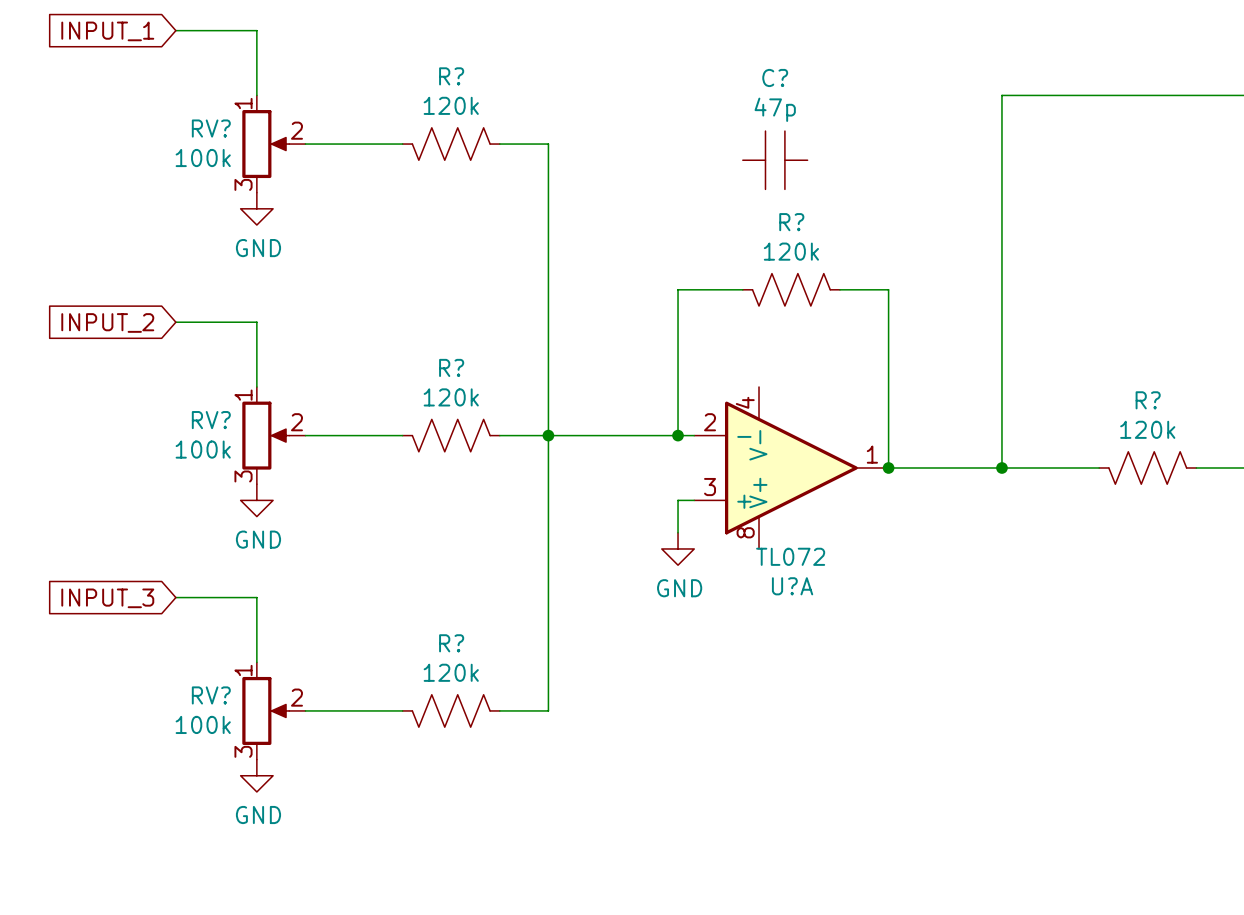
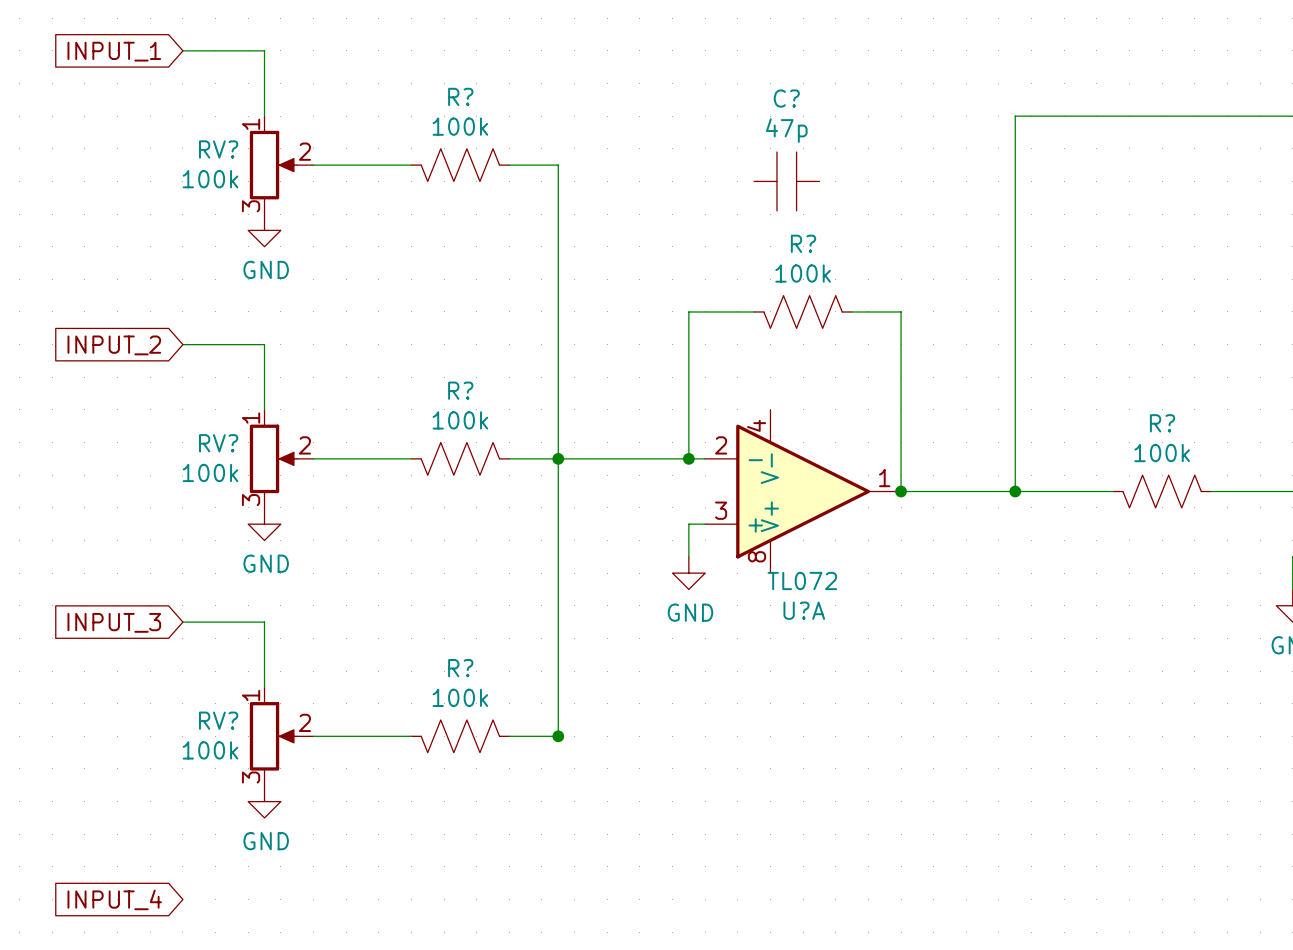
R? value: 120k (451, 105) -> 100k (460, 126)
R? value: 120k (791, 251) -> 100k (803, 273)
R? value: 120k (451, 397) -> 100k (460, 420)
R? value: 120k (1147, 429) -> 100k (1162, 453)
R? value: 120k (451, 672) -> 100k (460, 697)
junction: none -> (558, 736)
global label: none -> INPUT_4 (114, 899)

